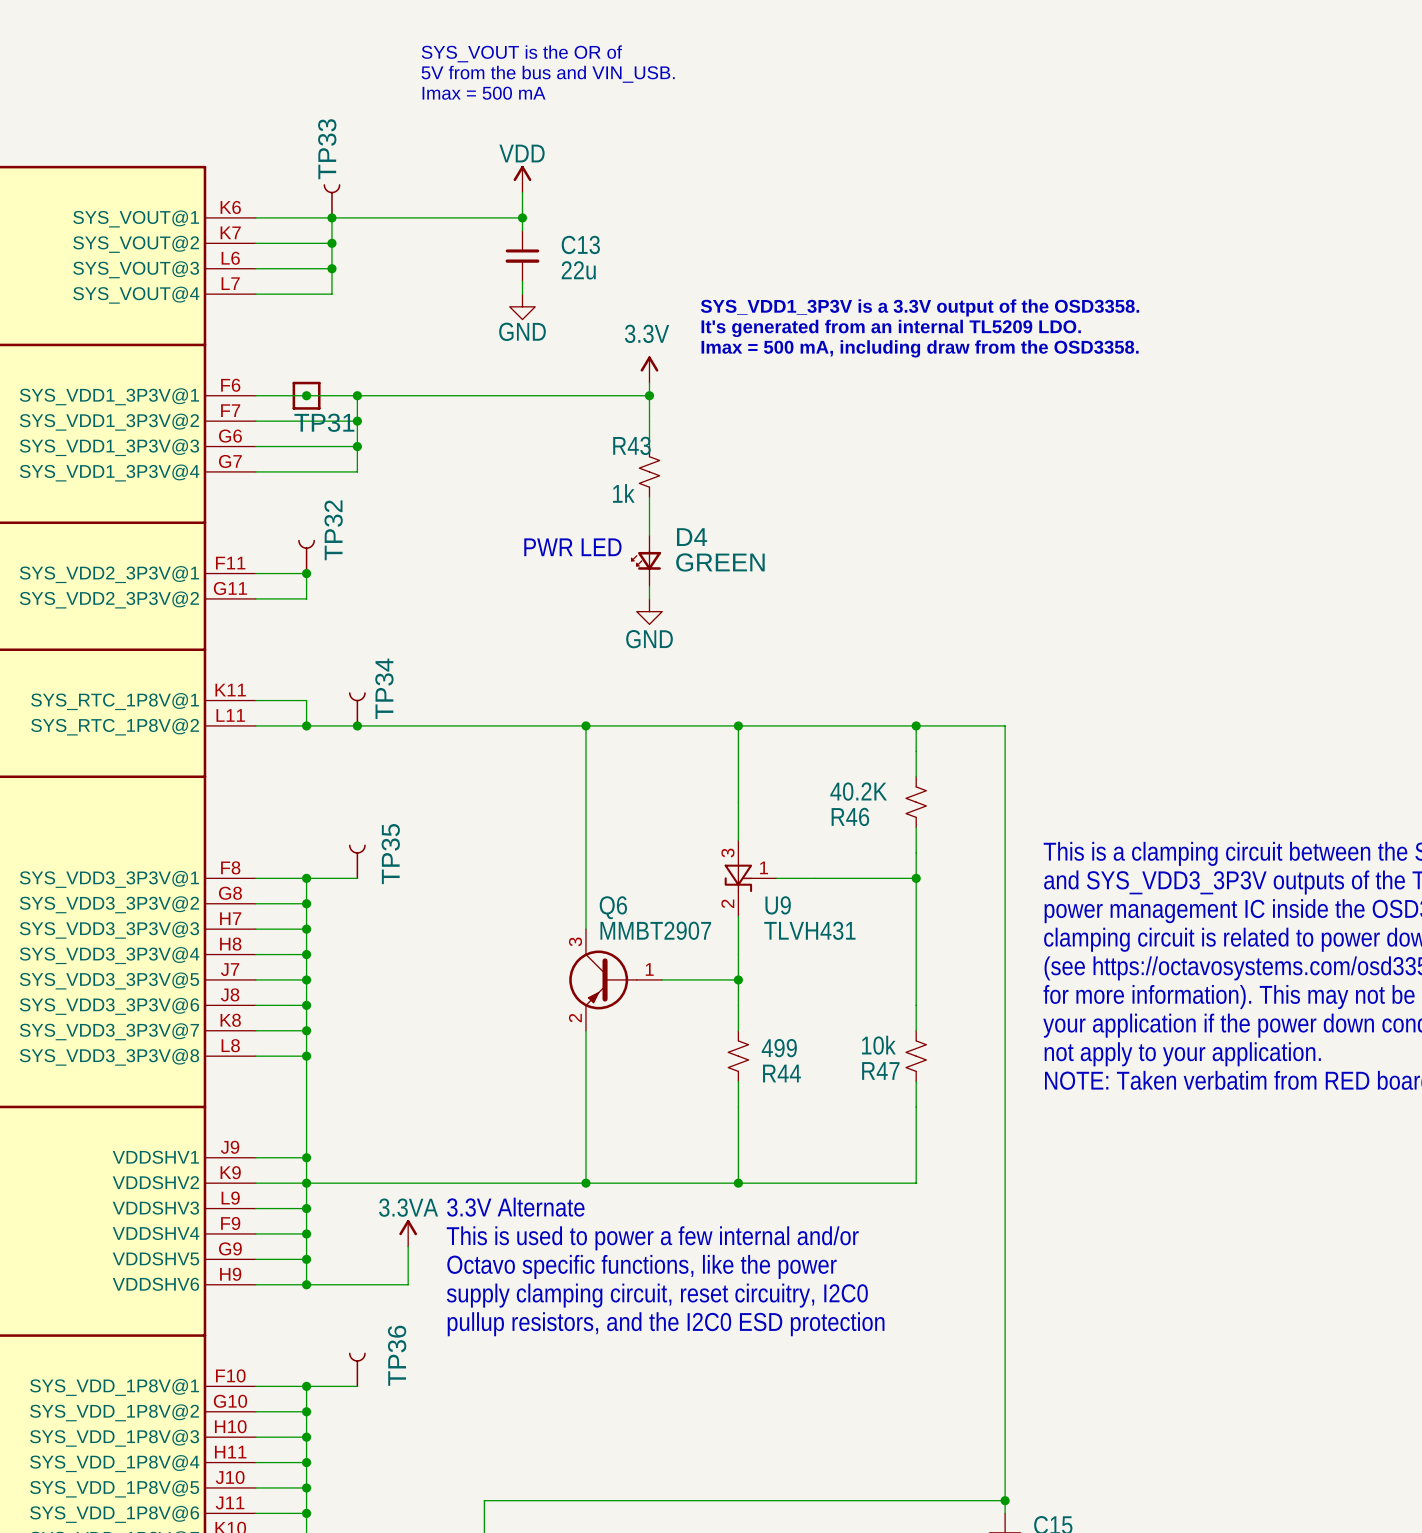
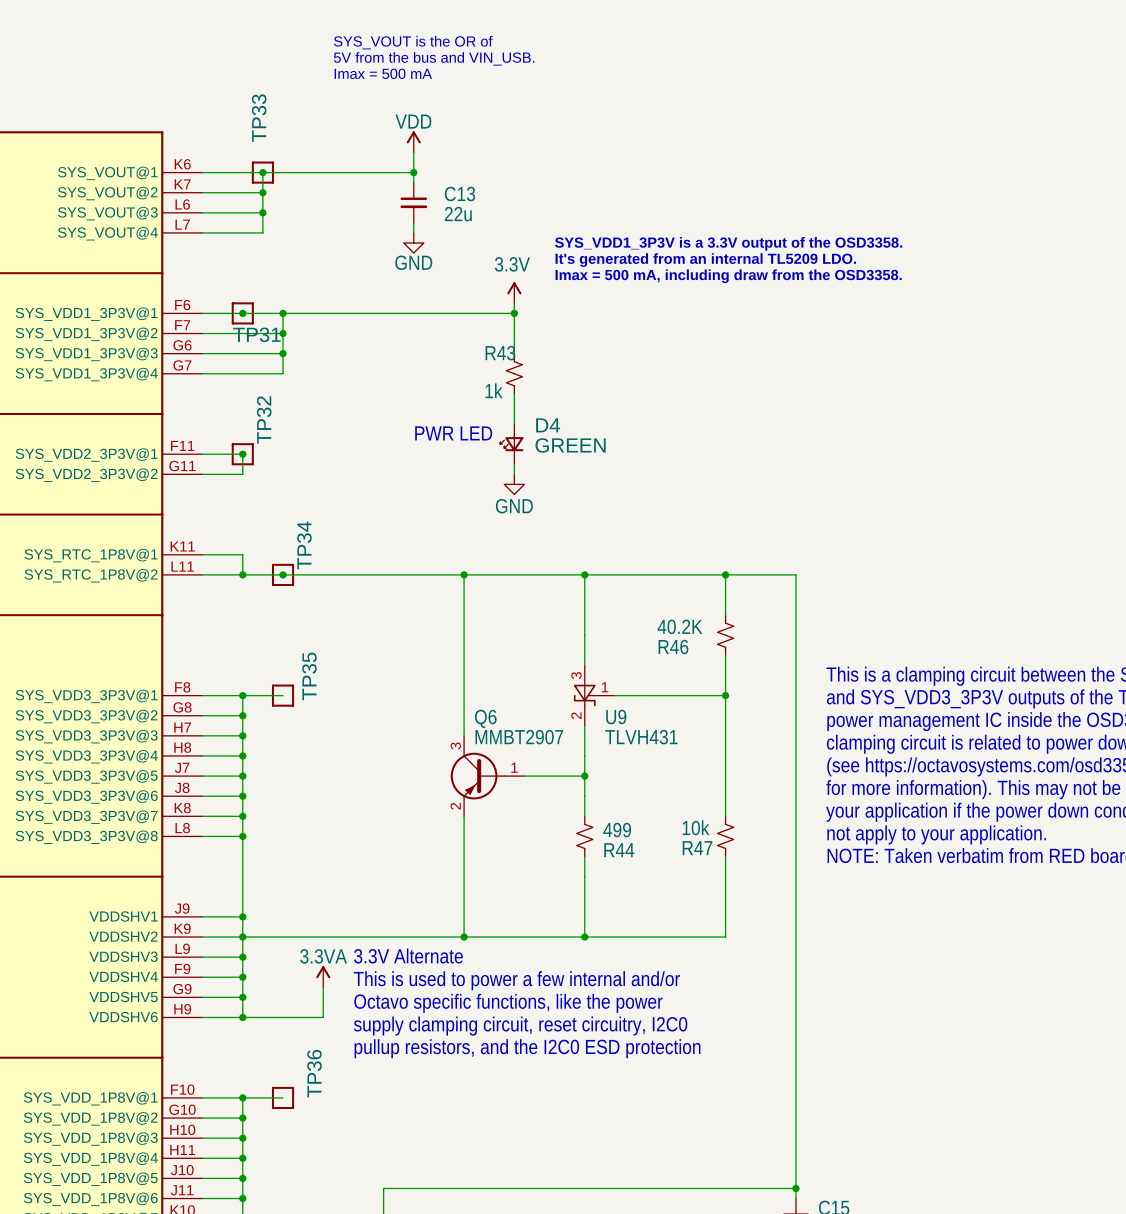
TP33 symbol: [323, 184, 341, 219] -> [251, 161, 274, 184]
TP32 symbol: [298, 539, 315, 575] -> [231, 443, 254, 466]
TP34 symbol: [348, 692, 366, 727] -> [271, 563, 295, 586]
TP35 symbol: [348, 844, 366, 880] -> [271, 684, 295, 707]
TP36 symbol: [348, 1352, 366, 1388] -> [271, 1086, 295, 1110]

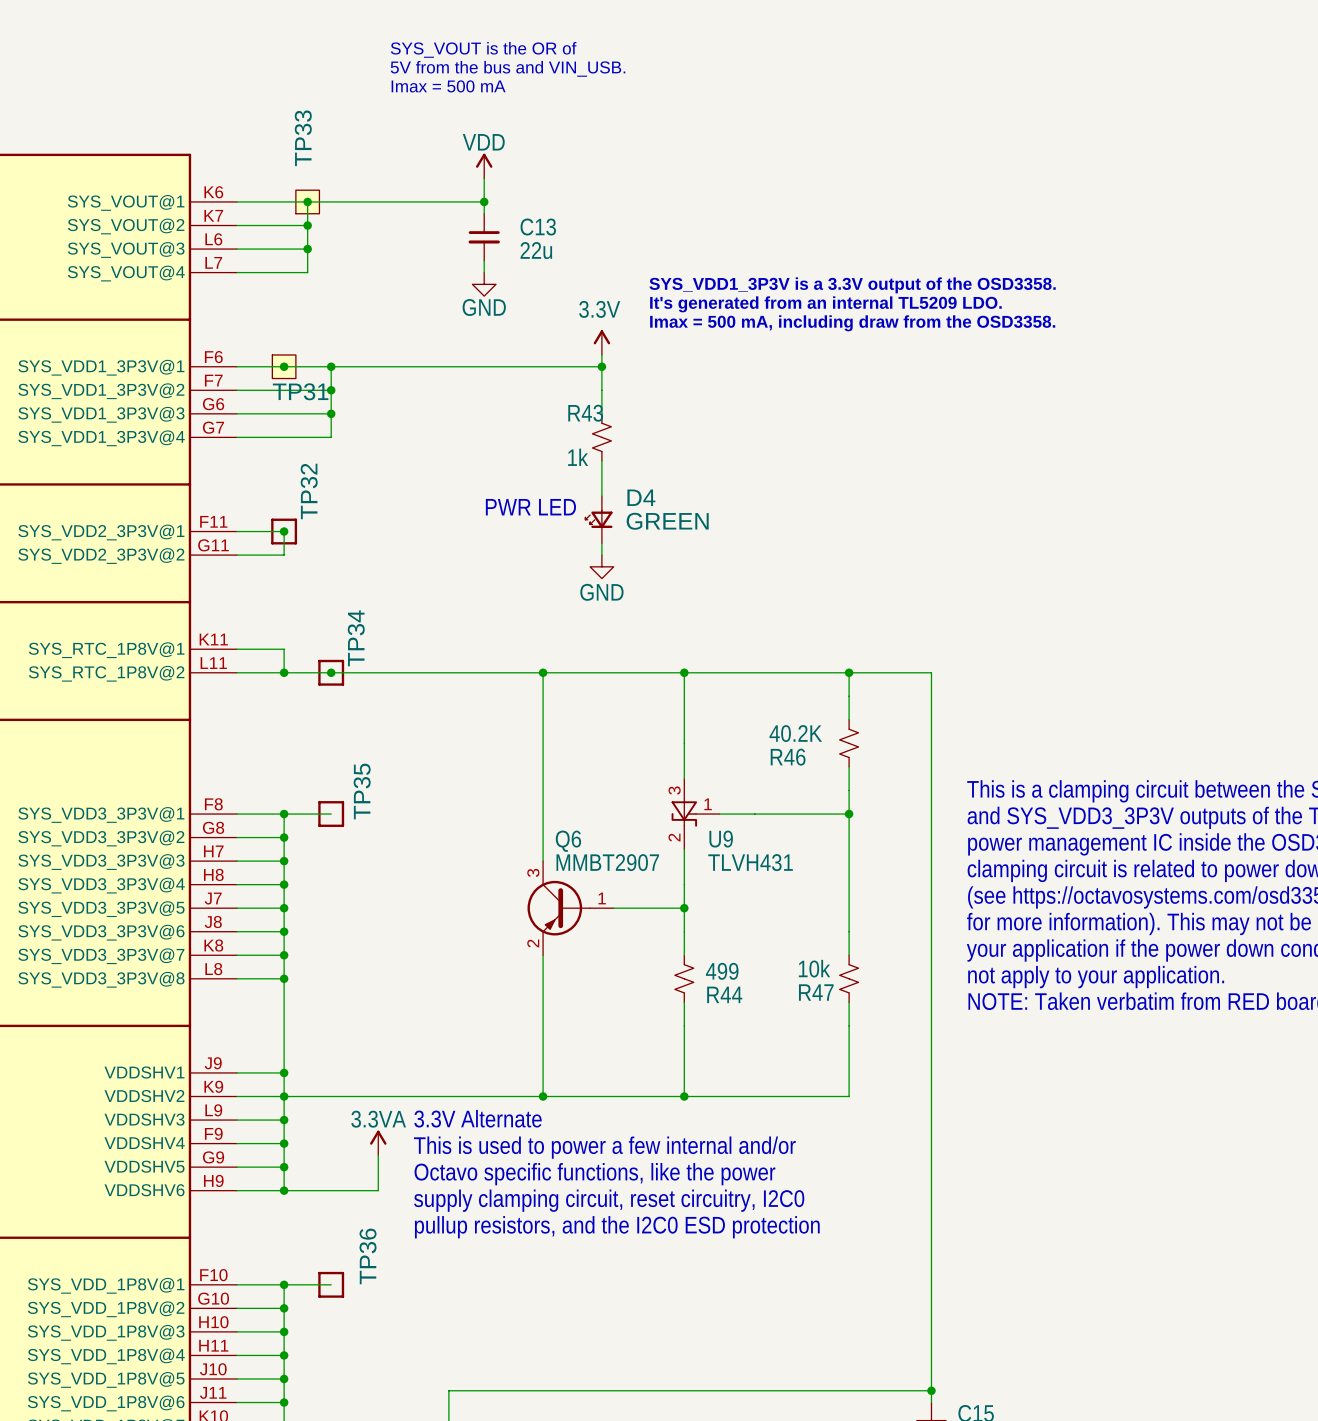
TP33 symbol: [251, 161, 274, 184] -> [295, 190, 320, 214]
TP31 symbol: [231, 302, 254, 325] -> [272, 354, 296, 379]

